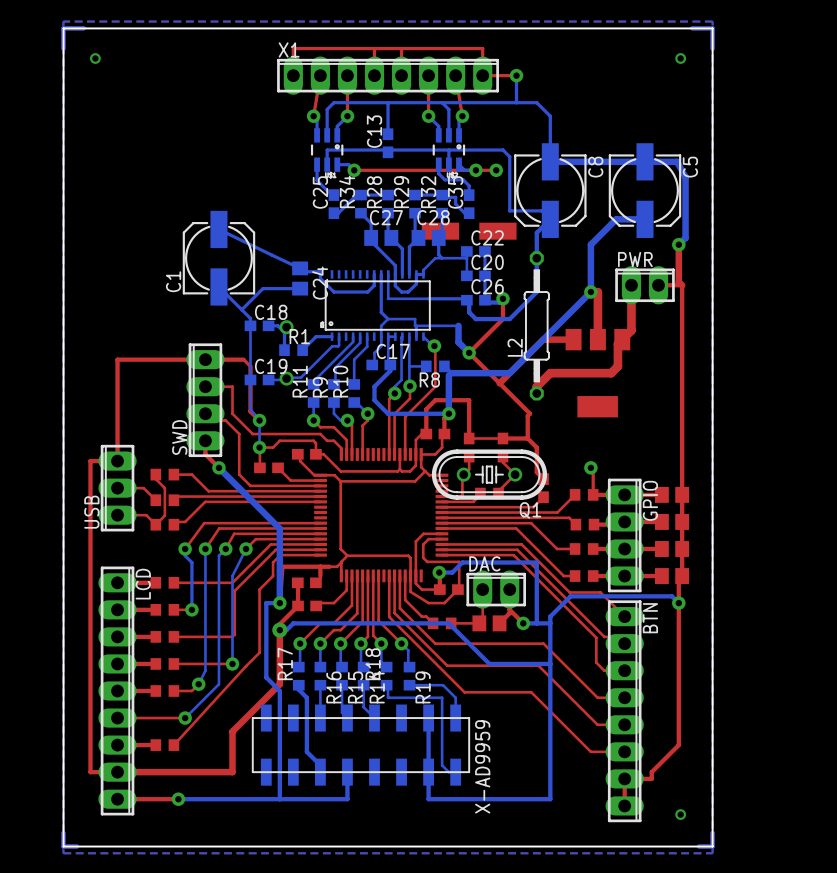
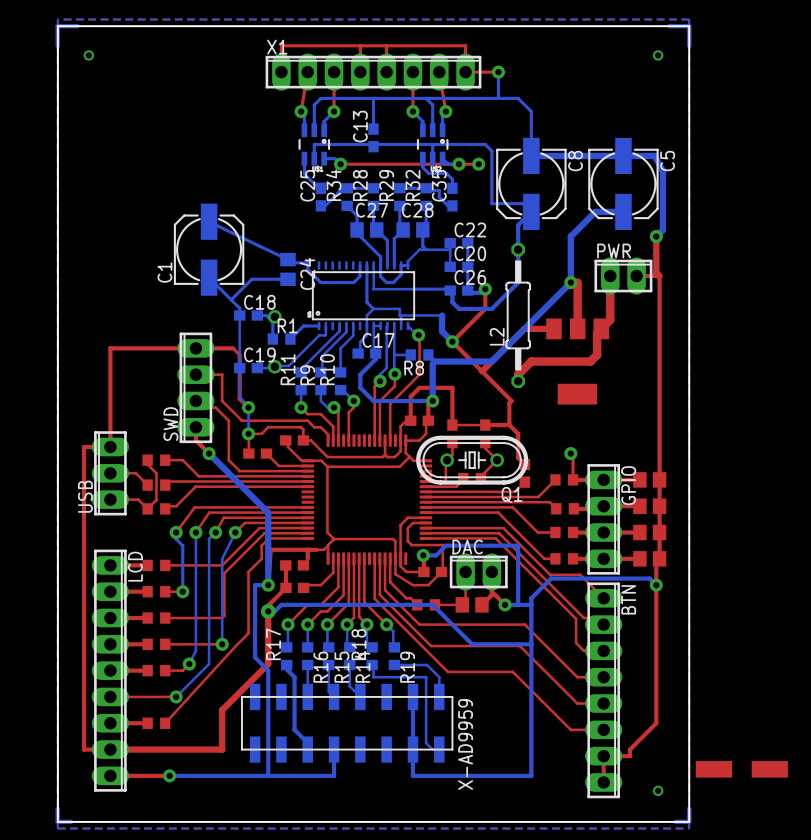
part: (469, 231) -> none
part: none -> (741, 769)

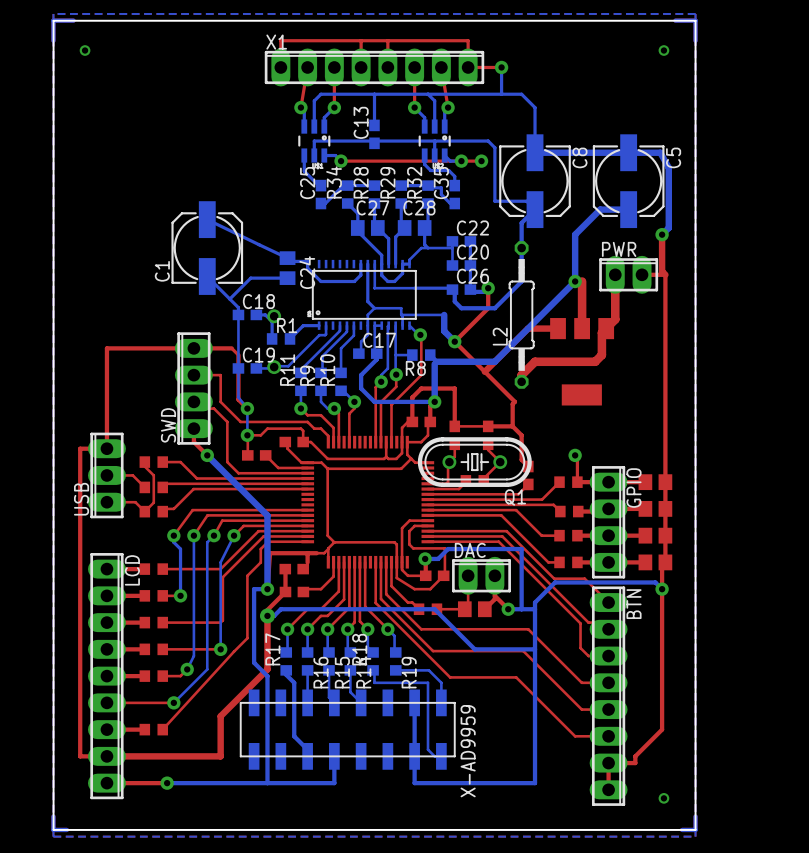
part: (741, 769) -> none

